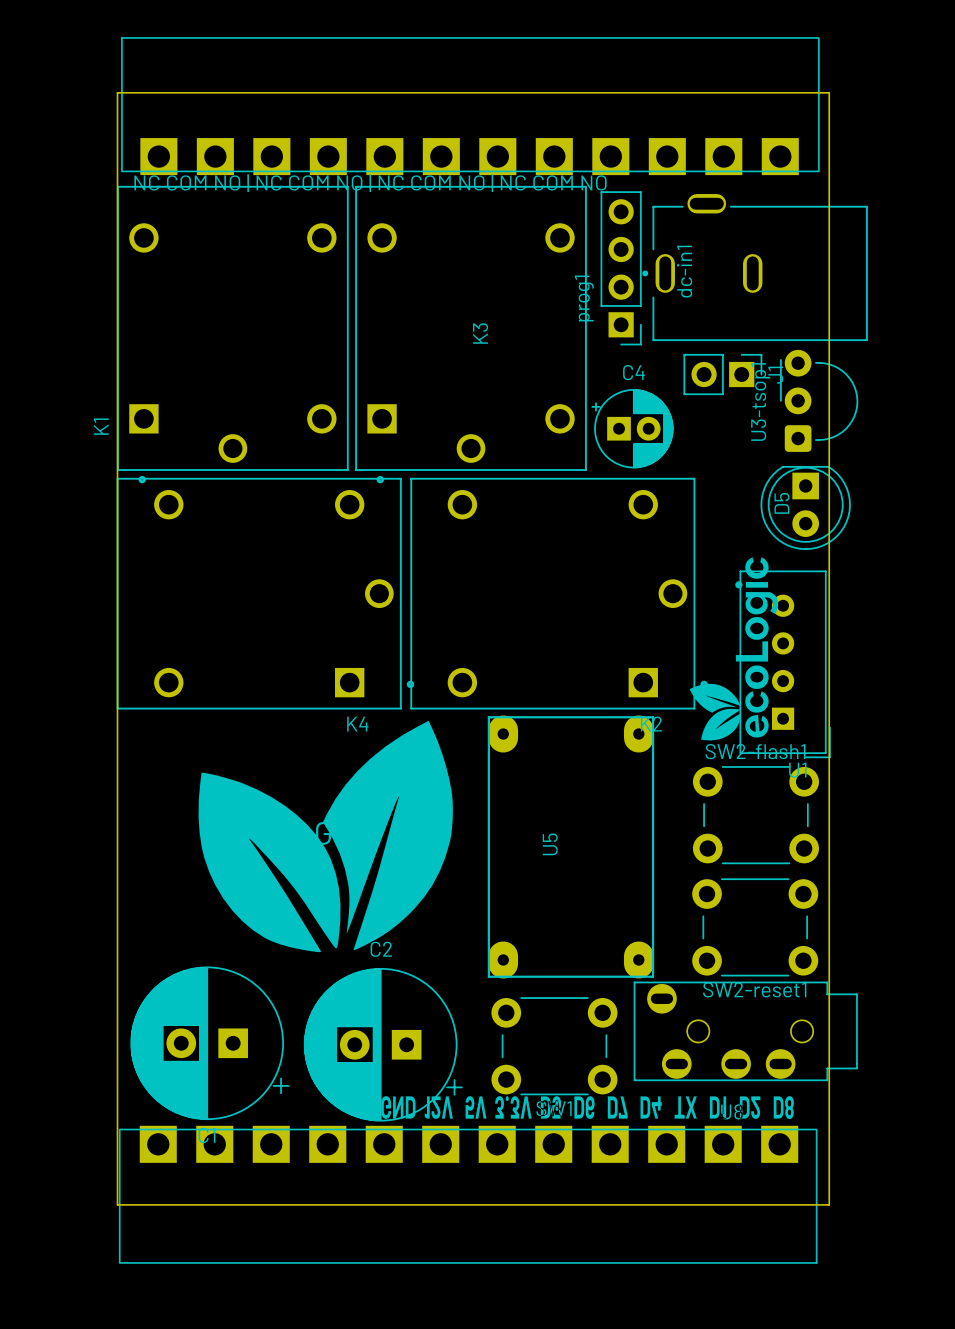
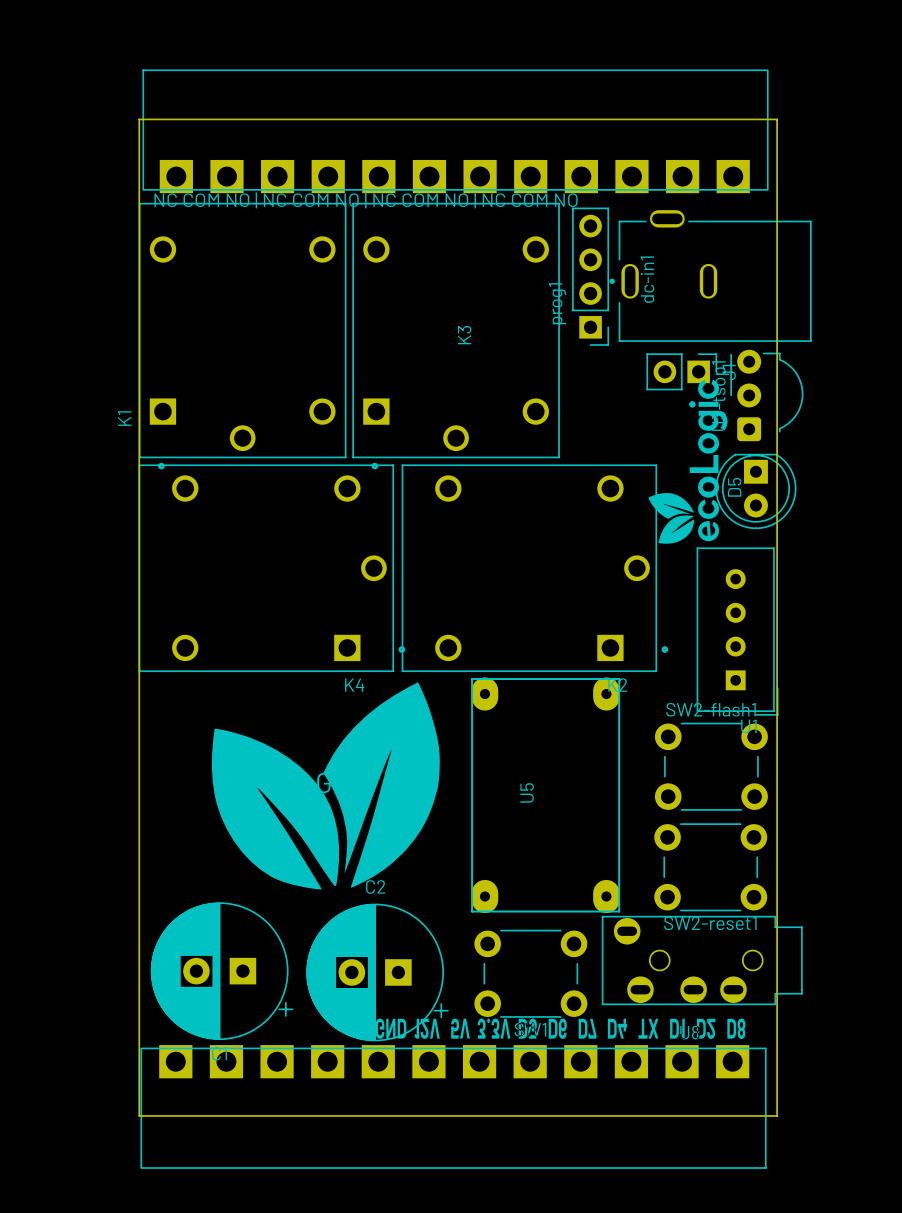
U3-tsop1 footprint: [780, 349, 859, 452] -> [730, 349, 804, 442]
C4: (632, 428) -> none
drawing position: (733, 648) -> (687, 461)

